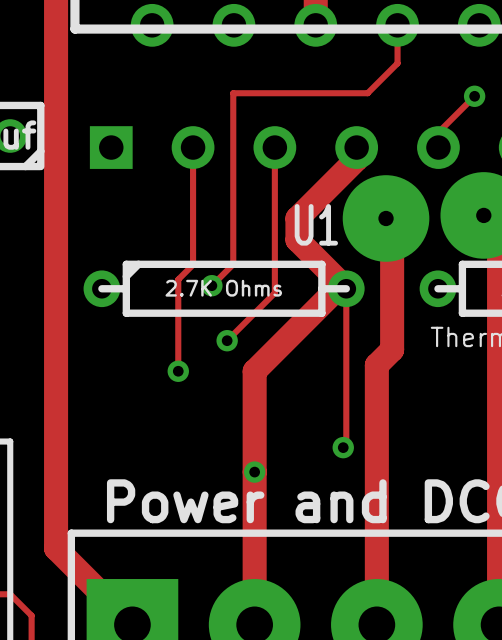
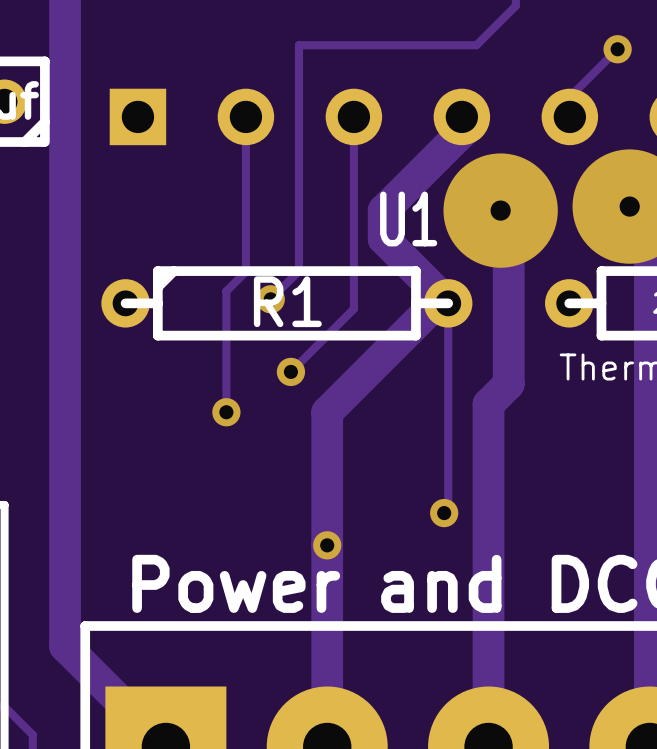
R1 name: none -> R1 (287, 301)
R1 value: 2.7K Ohms (223, 288) -> none

